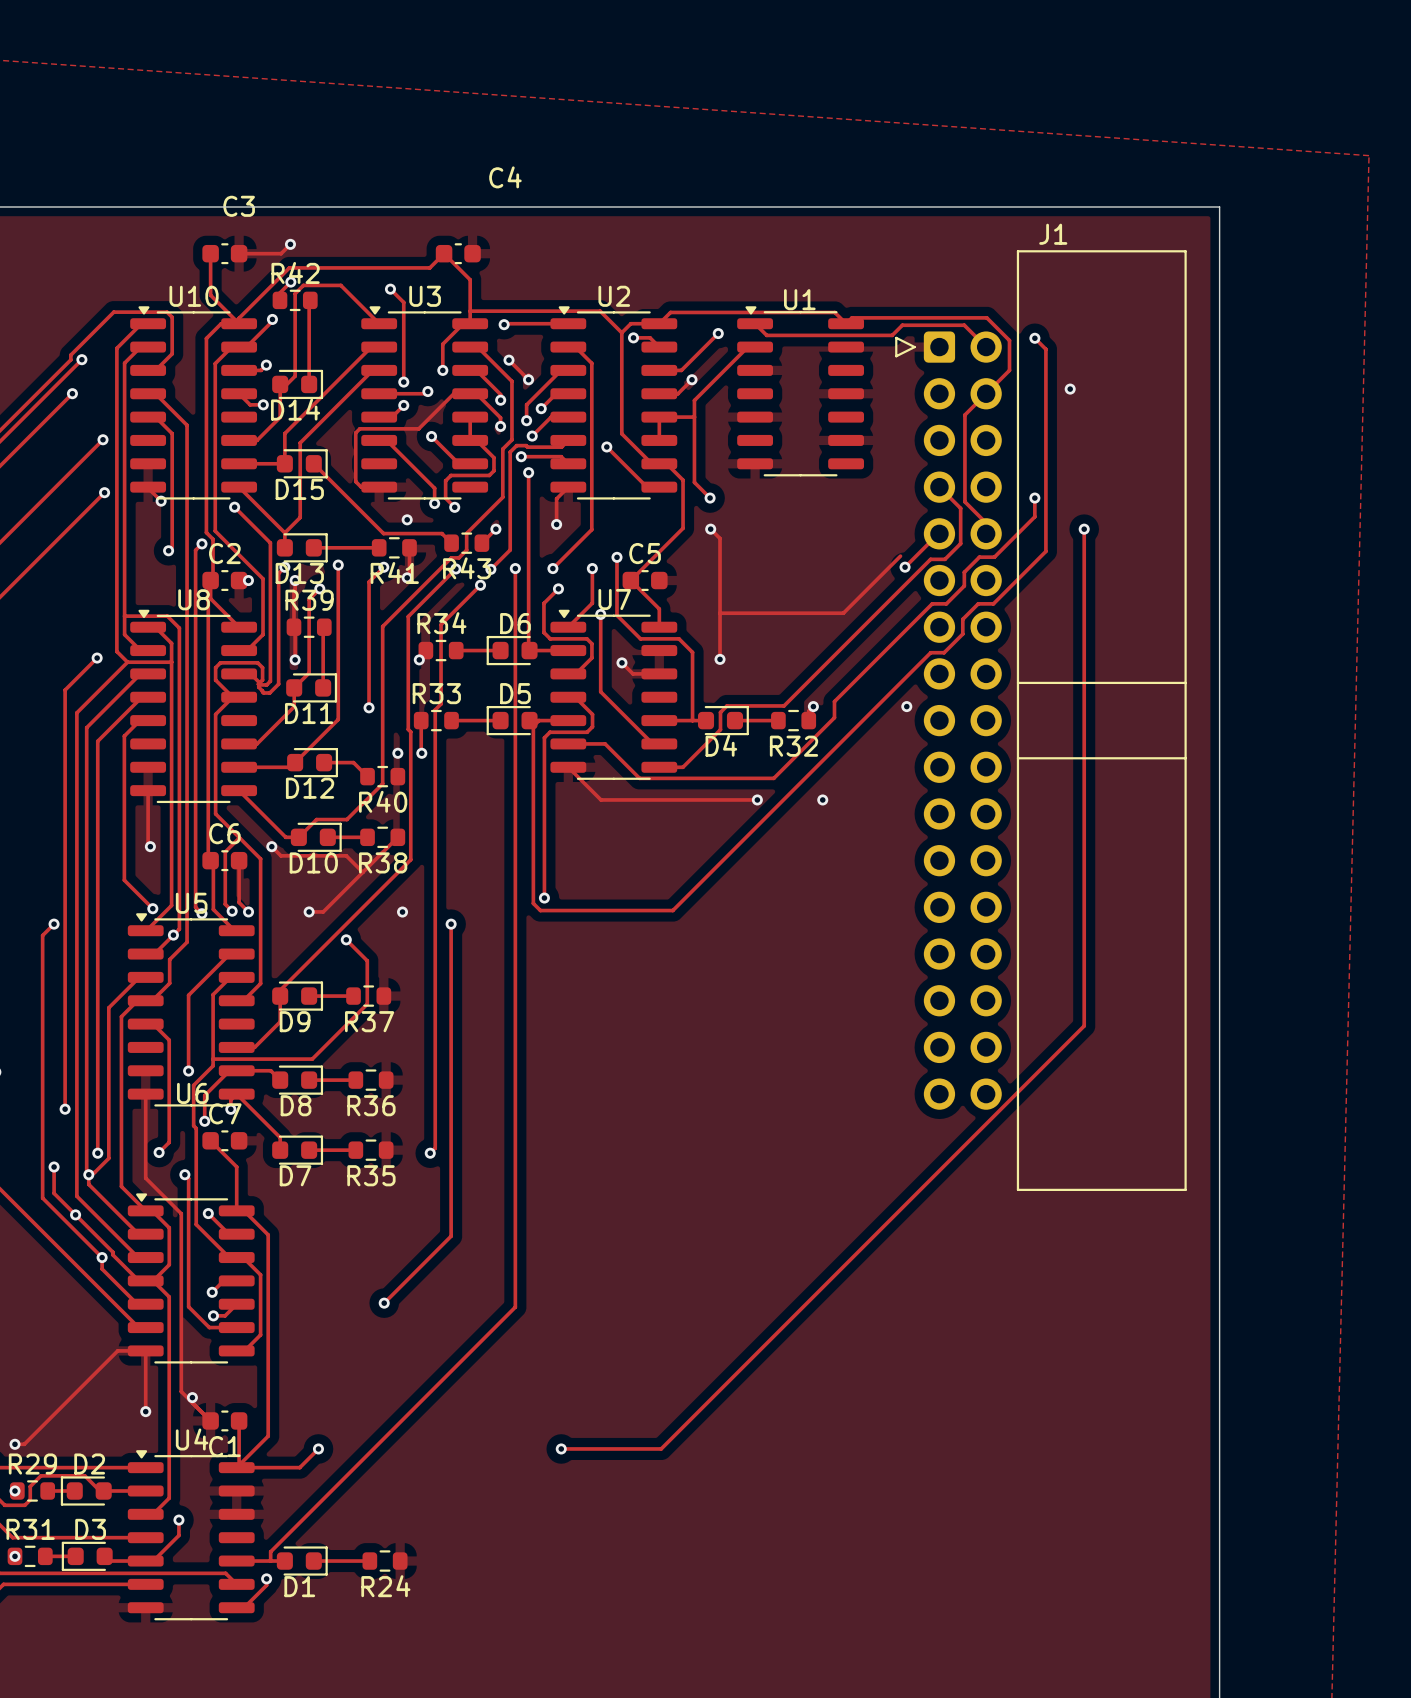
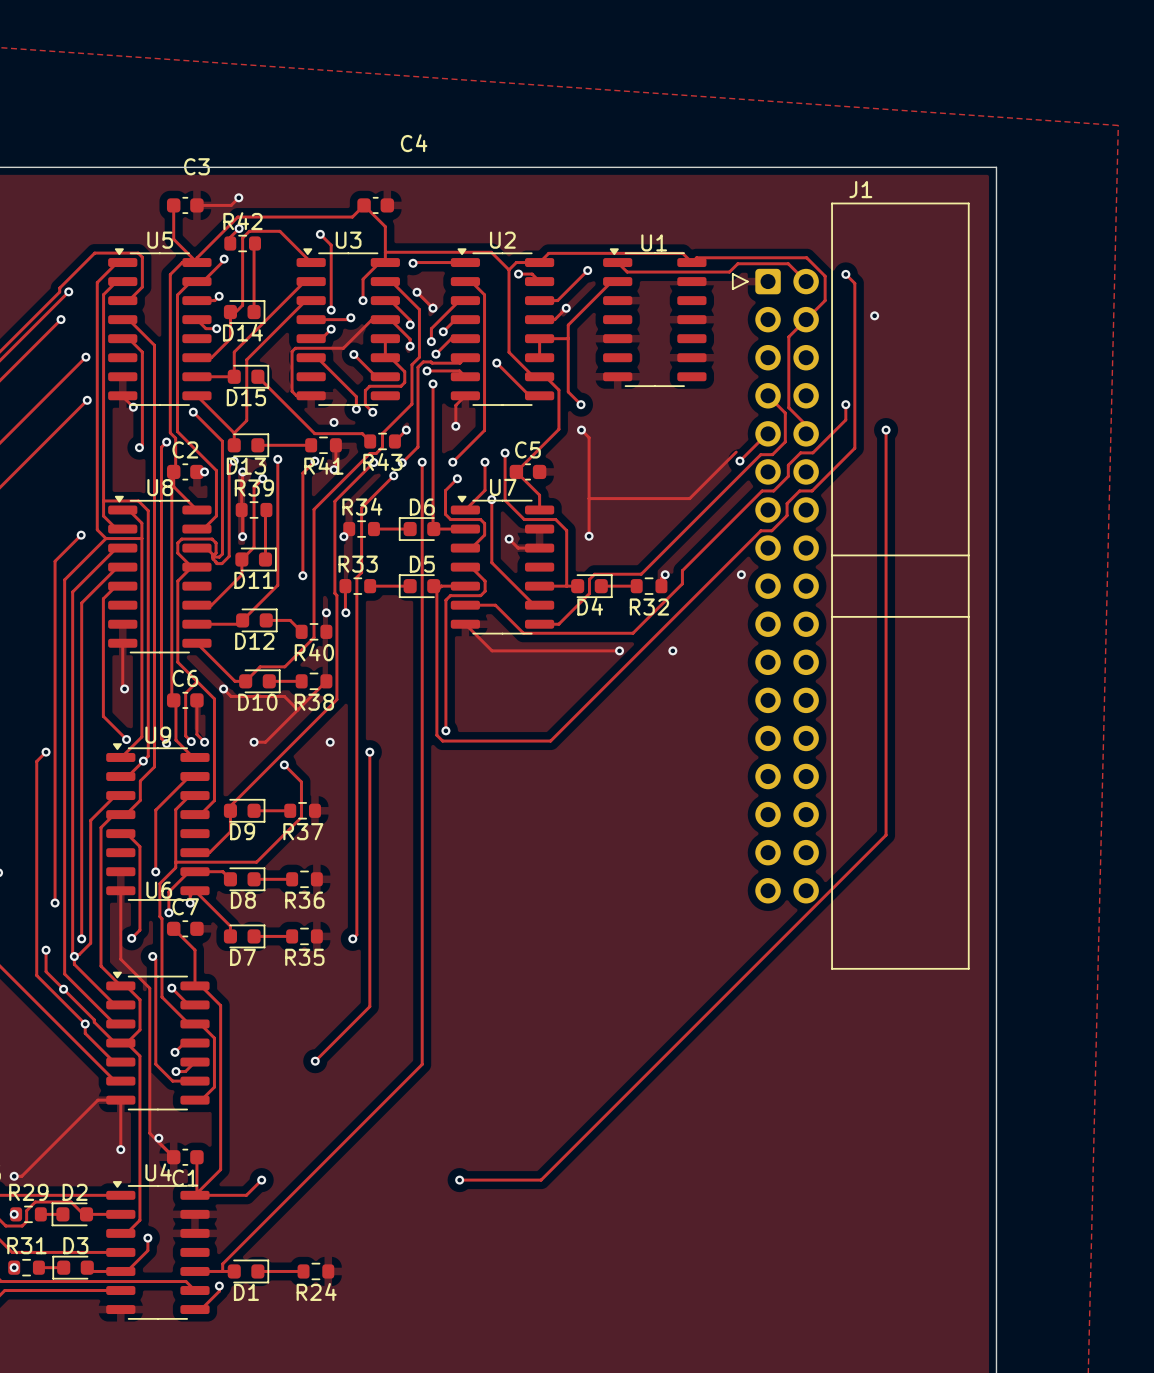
U10 name: U10 (194, 296) -> U5 (160, 240)
U5 name: U5 (191, 903) -> U9 (158, 735)

